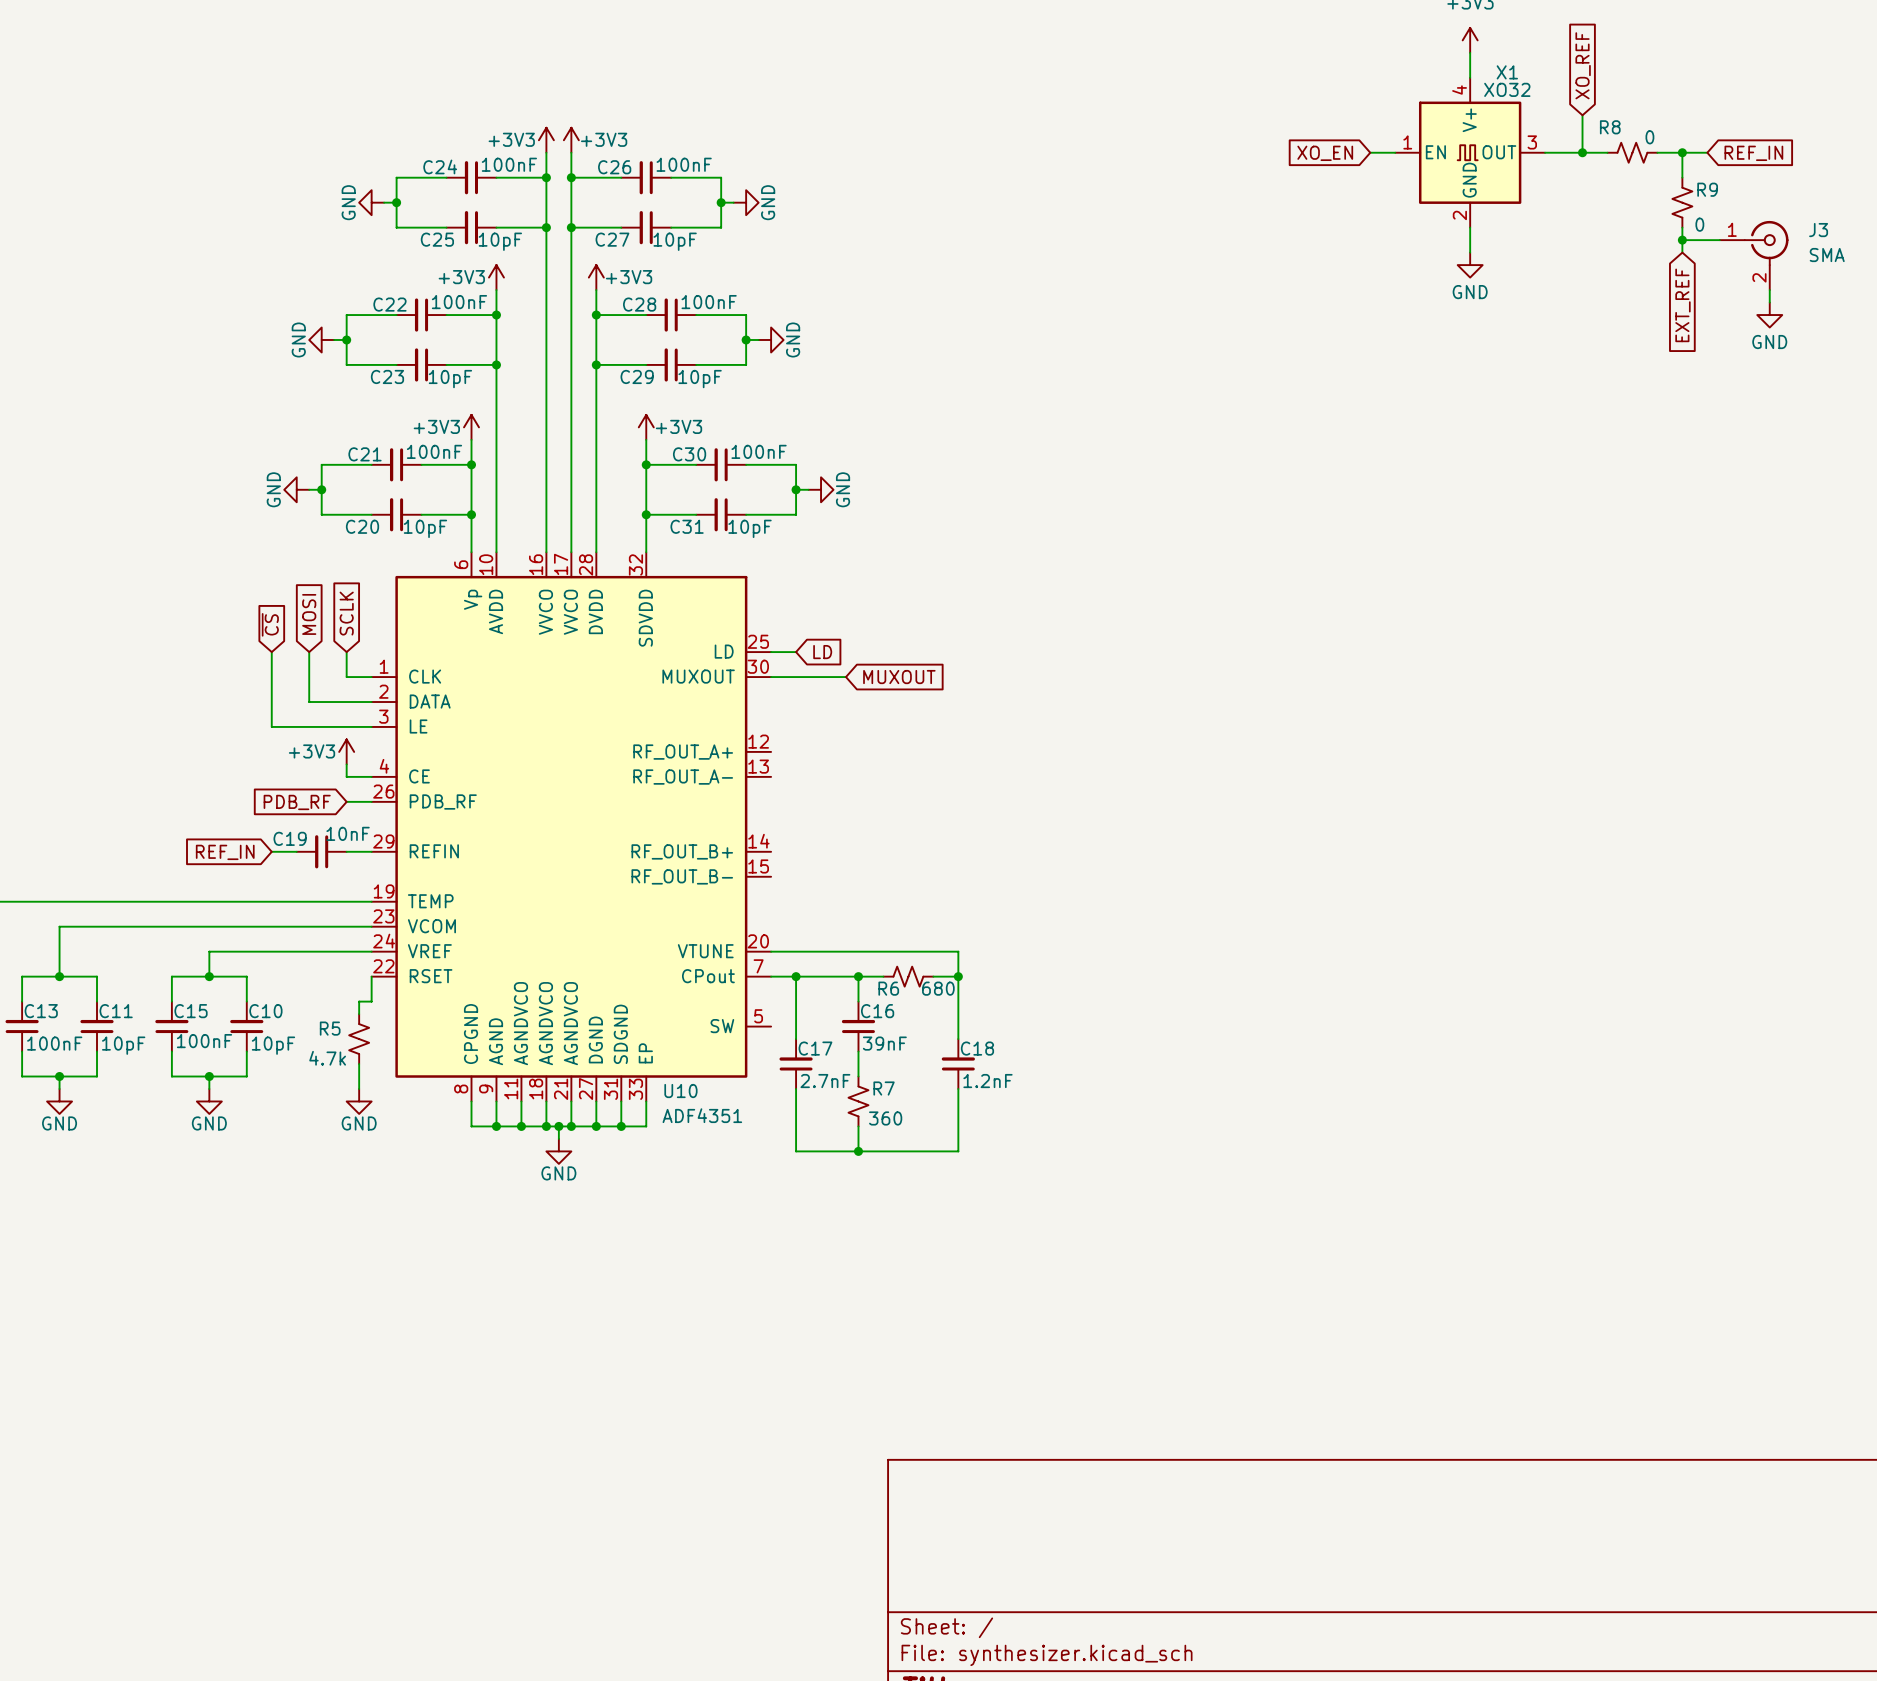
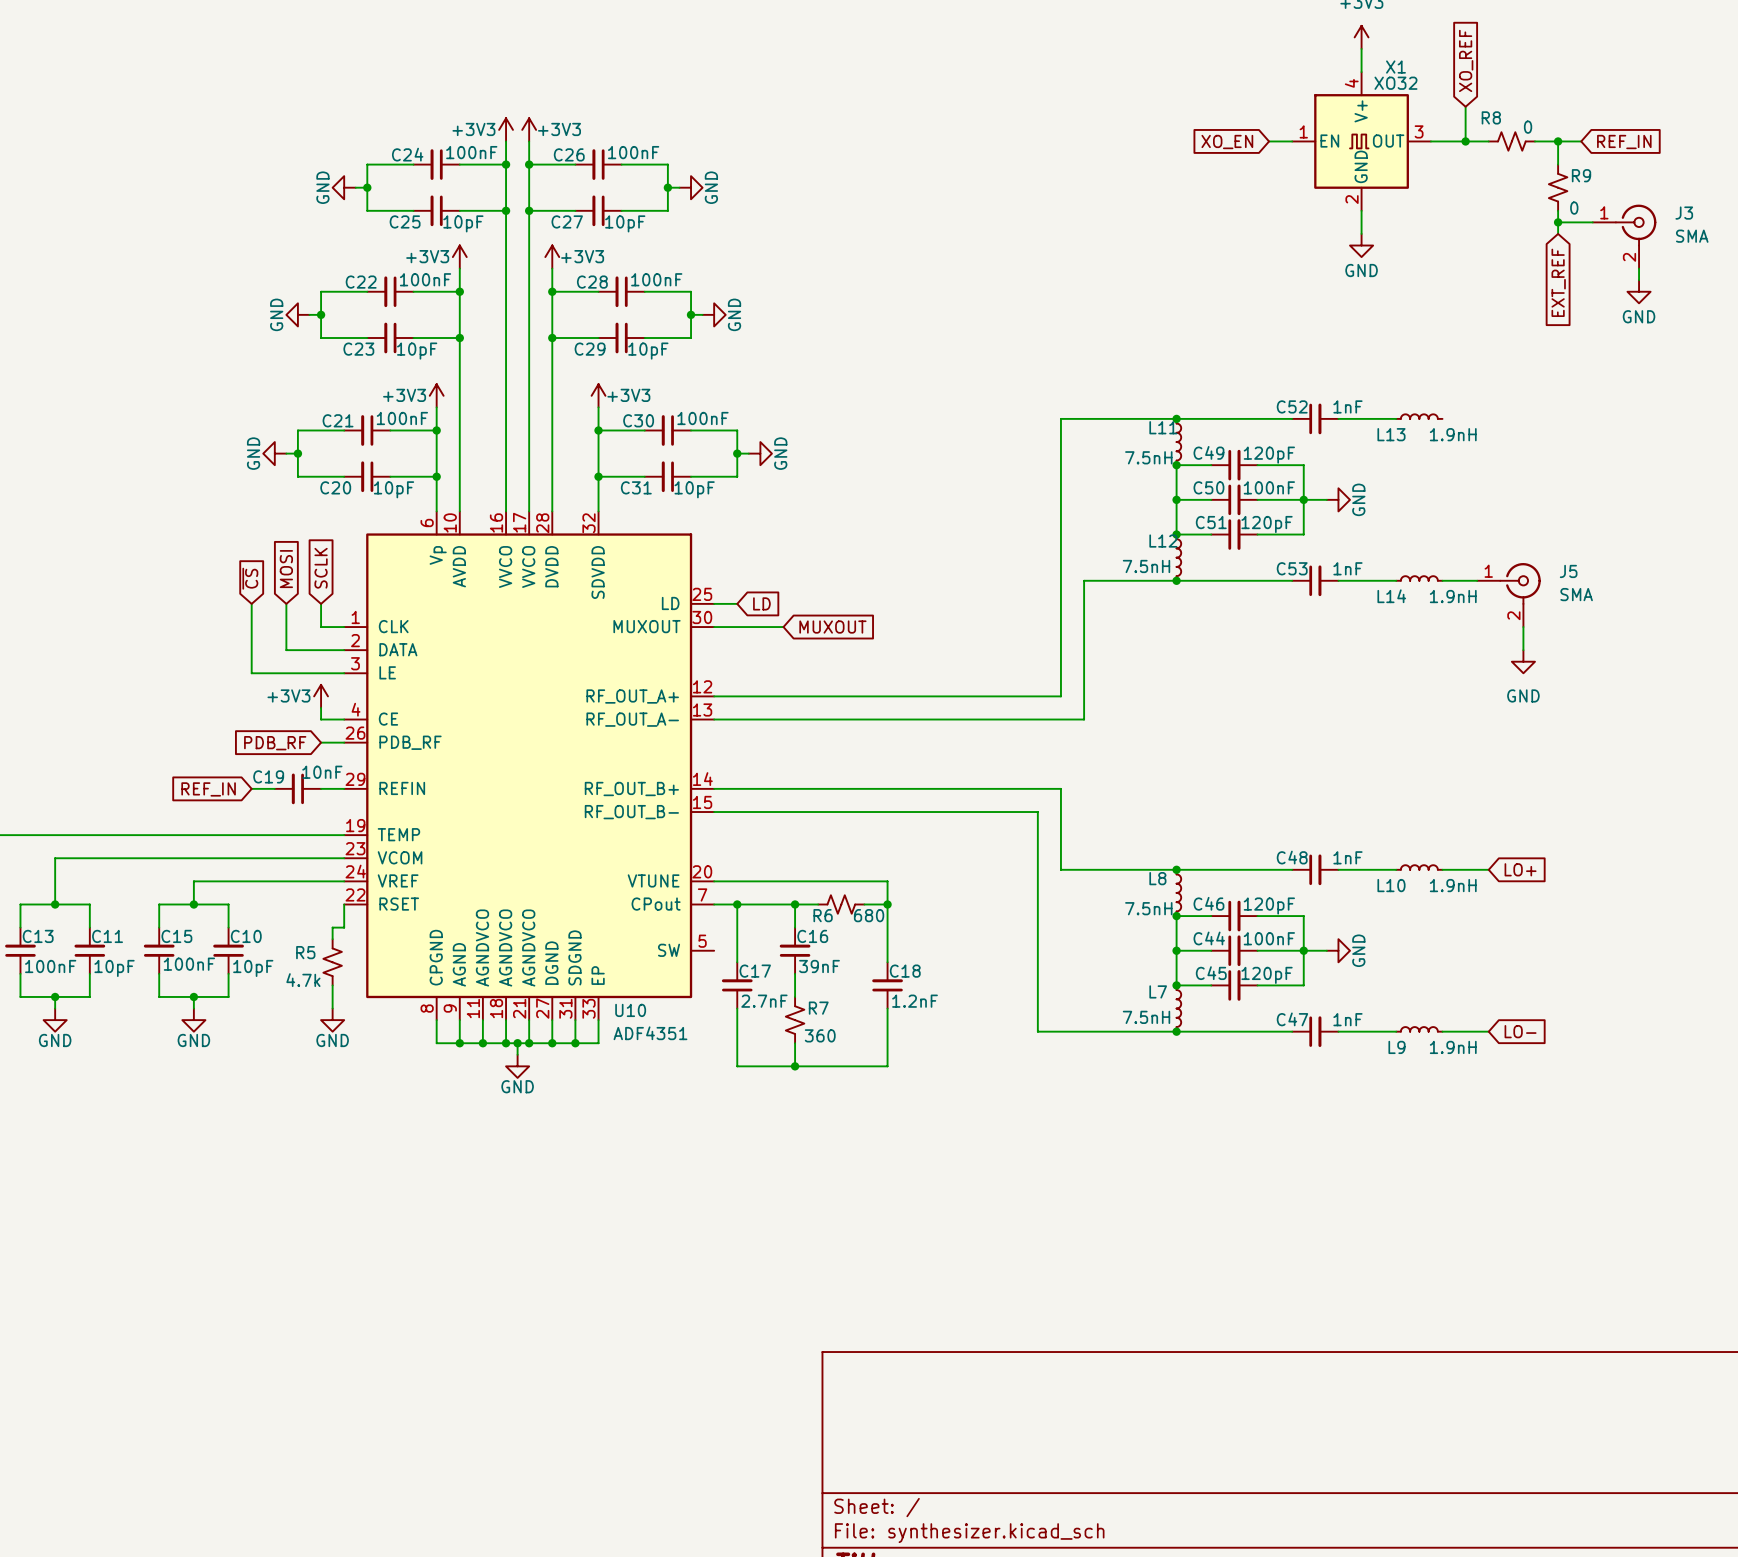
L13: none -> 1.9nH (1419, 416)
junction: none -> (1176, 418)
wire: none -> (1292, 418) (1060, 418) (1060, 696) (714, 696)
C52: none -> 1nF (1315, 418)
wire: none -> (1338, 418) (1396, 418)
L11: none -> 7.5nH (1178, 442)
junction: none -> (1176, 465)
wire: none -> (1211, 465) (1176, 465) (1176, 534) (1211, 534)
C49: none -> 120pF (1234, 465)
wire: none -> (1257, 465) (1303, 465) (1303, 534) (1257, 534)
wire: none -> (1176, 499) (1211, 499)
junction: none -> (1176, 499)
C50: none -> 100nF (1234, 499)
wire: none -> (1257, 499) (1326, 499)
junction: none -> (1303, 499)
power symbol: none -> GND (1338, 499)
junction: none -> (1176, 534)
C51: none -> 120pF (1234, 534)
L12: none -> 7.5nH (1178, 557)
L14: none -> 1.9nH (1419, 578)
junction: none -> (1176, 580)
wire: none -> (1292, 580) (1084, 580) (1084, 719) (714, 719)
C53: none -> 1nF (1315, 580)
wire: none -> (1338, 580) (1396, 580)
wire: none -> (1442, 580) (1477, 580)
J5: none -> SMA (1508, 595)
wire: none -> (1523, 627) (1523, 650)
power symbol: none -> GND (1523, 661)
wire: none -> (714, 788) (1060, 788) (1060, 869) (1292, 869)
wire: none -> (714, 812) (1037, 812) (1037, 1031) (1292, 1031)
L10: none -> 1.9nH (1419, 867)
junction: none -> (1176, 869)
C48: none -> 1nF (1315, 869)
wire: none -> (1338, 869) (1396, 869)
wire: none -> (1442, 869) (1488, 869)
global label: none -> LO+ (1520, 869)
L8: none -> 7.5nH (1178, 892)
junction: none -> (1176, 916)
wire: none -> (1211, 916) (1176, 916) (1176, 985) (1211, 985)
C46: none -> 120pF (1234, 916)
wire: none -> (1257, 916) (1303, 916) (1303, 985) (1257, 985)
wire: none -> (1176, 950) (1211, 950)
junction: none -> (1176, 950)
C44: none -> 100nF (1234, 950)
wire: none -> (1257, 950) (1326, 950)
junction: none -> (1303, 950)
power symbol: none -> GND (1338, 950)
junction: none -> (1176, 985)
C45: none -> 120pF (1234, 985)
L7: none -> 7.5nH (1178, 1008)
L9: none -> 1.9nH (1419, 1029)
junction: none -> (1176, 1031)
C47: none -> 1nF (1315, 1031)
wire: none -> (1338, 1031) (1396, 1031)
wire: none -> (1442, 1031) (1488, 1031)
global label: none -> LO- (1520, 1031)

